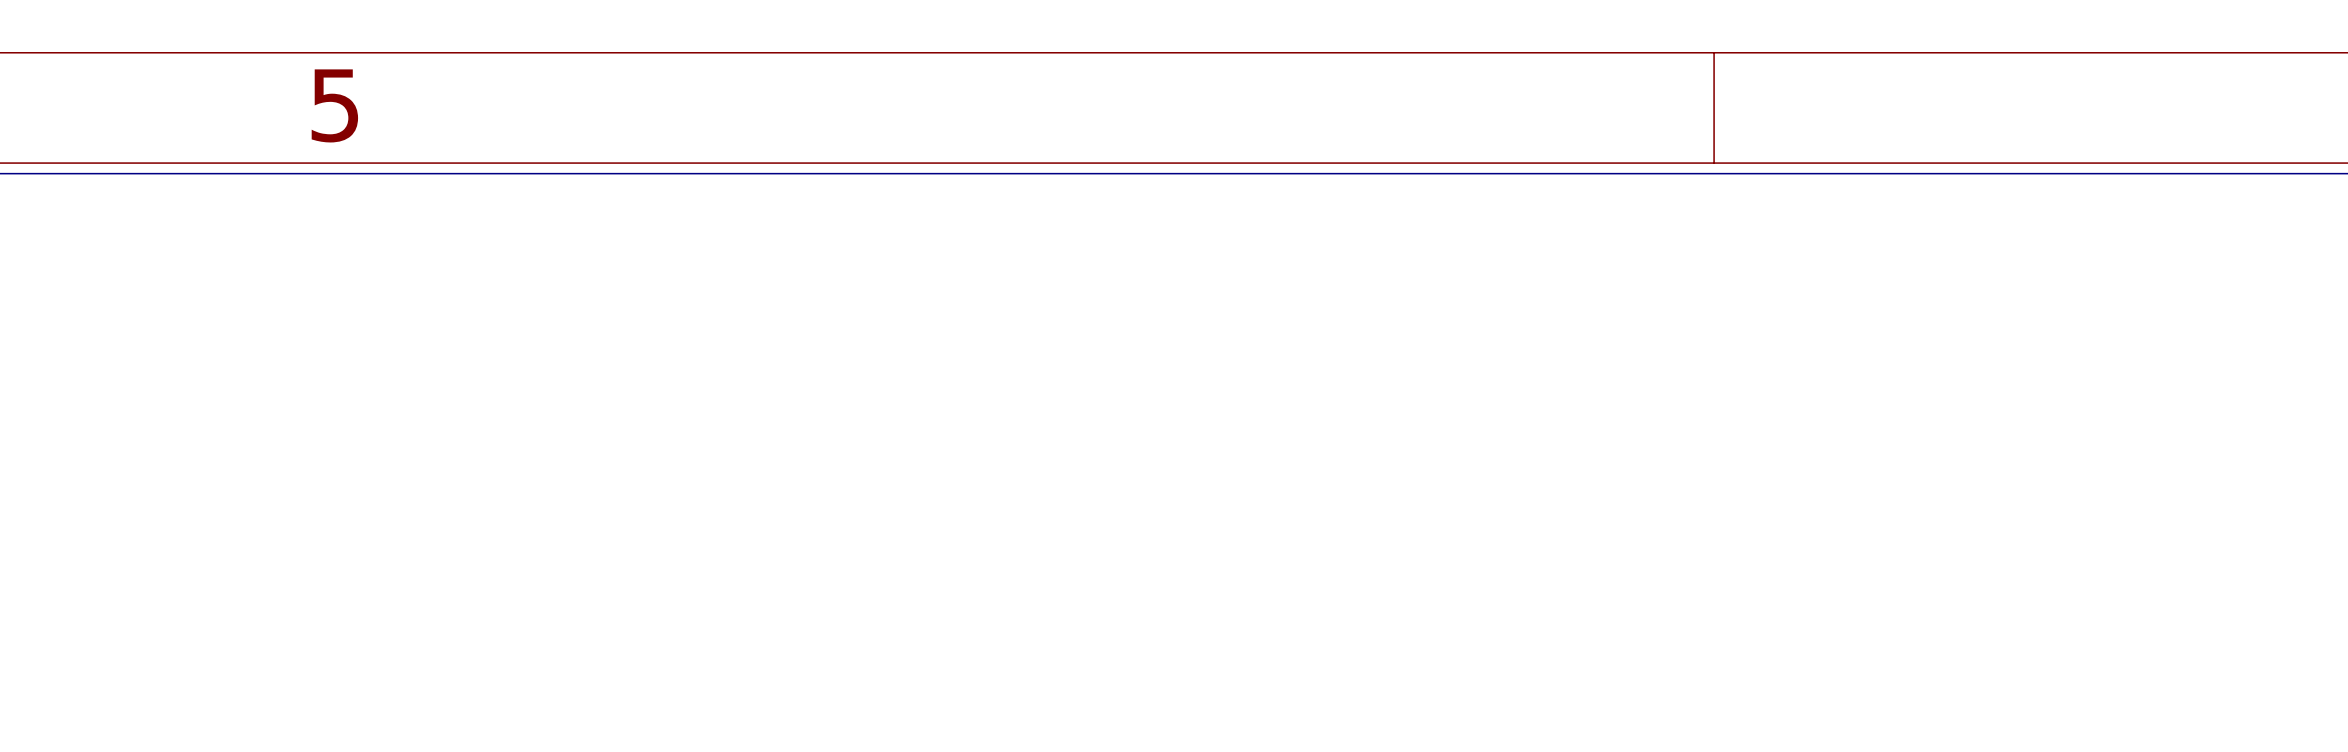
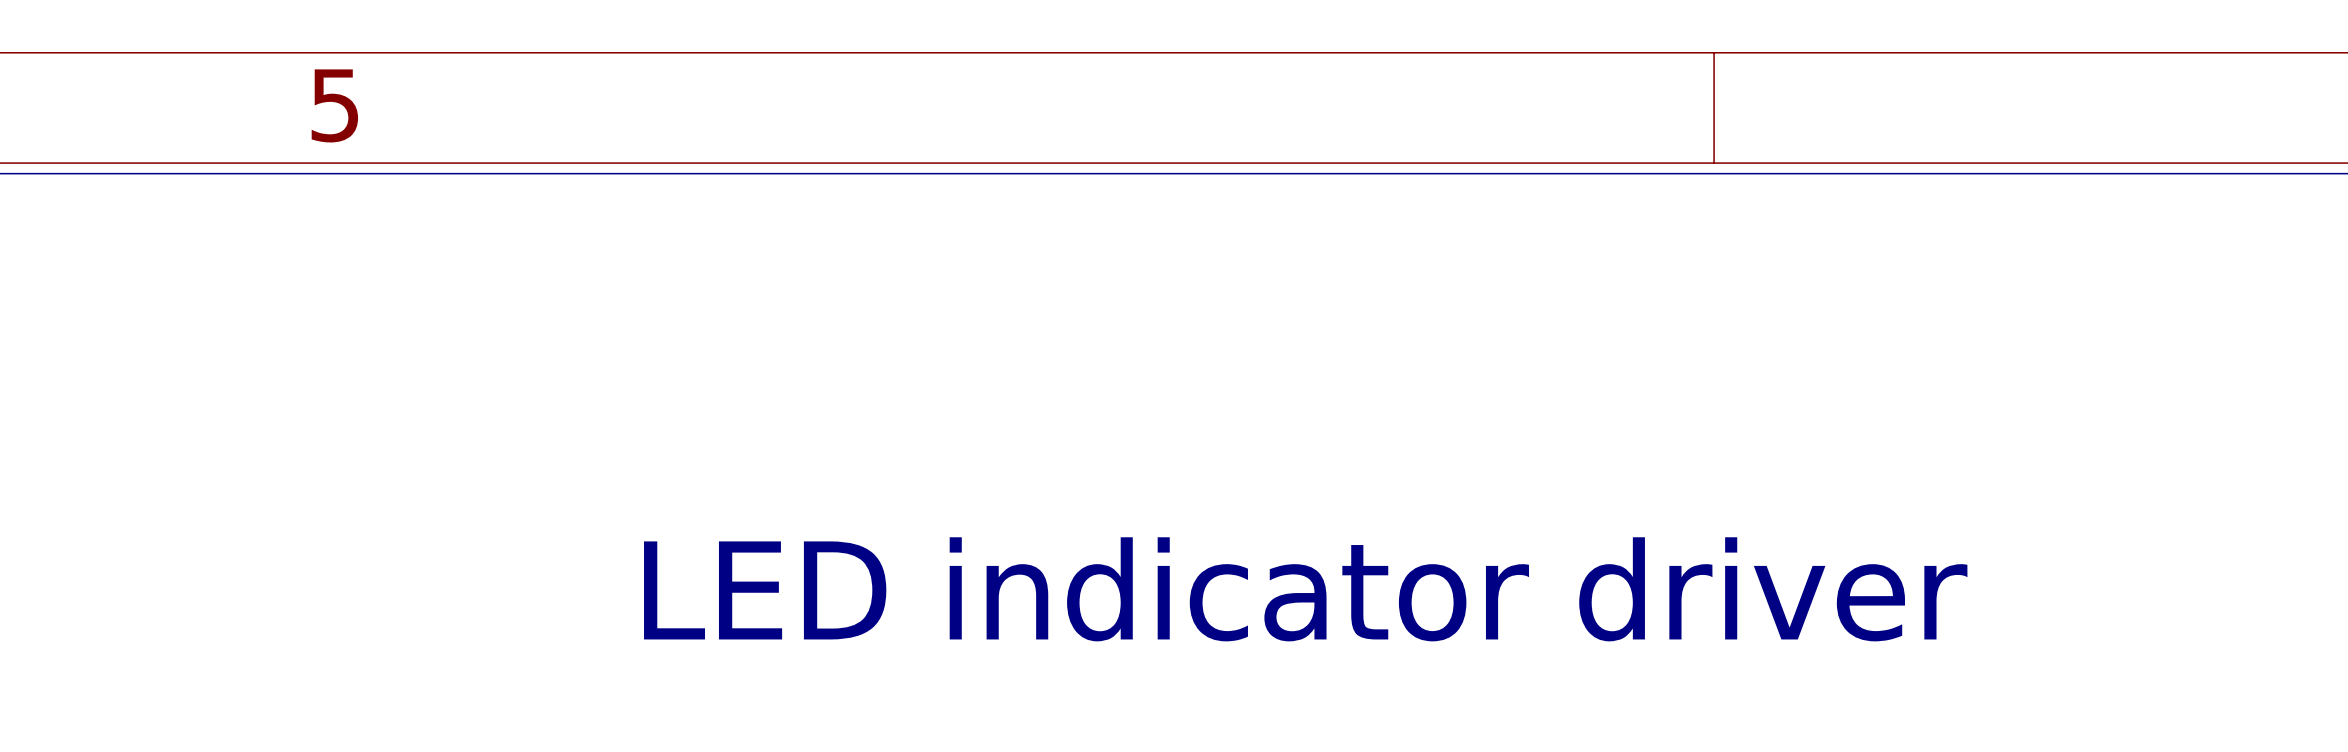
text: none -> LED indicator driver (1305, 589)

